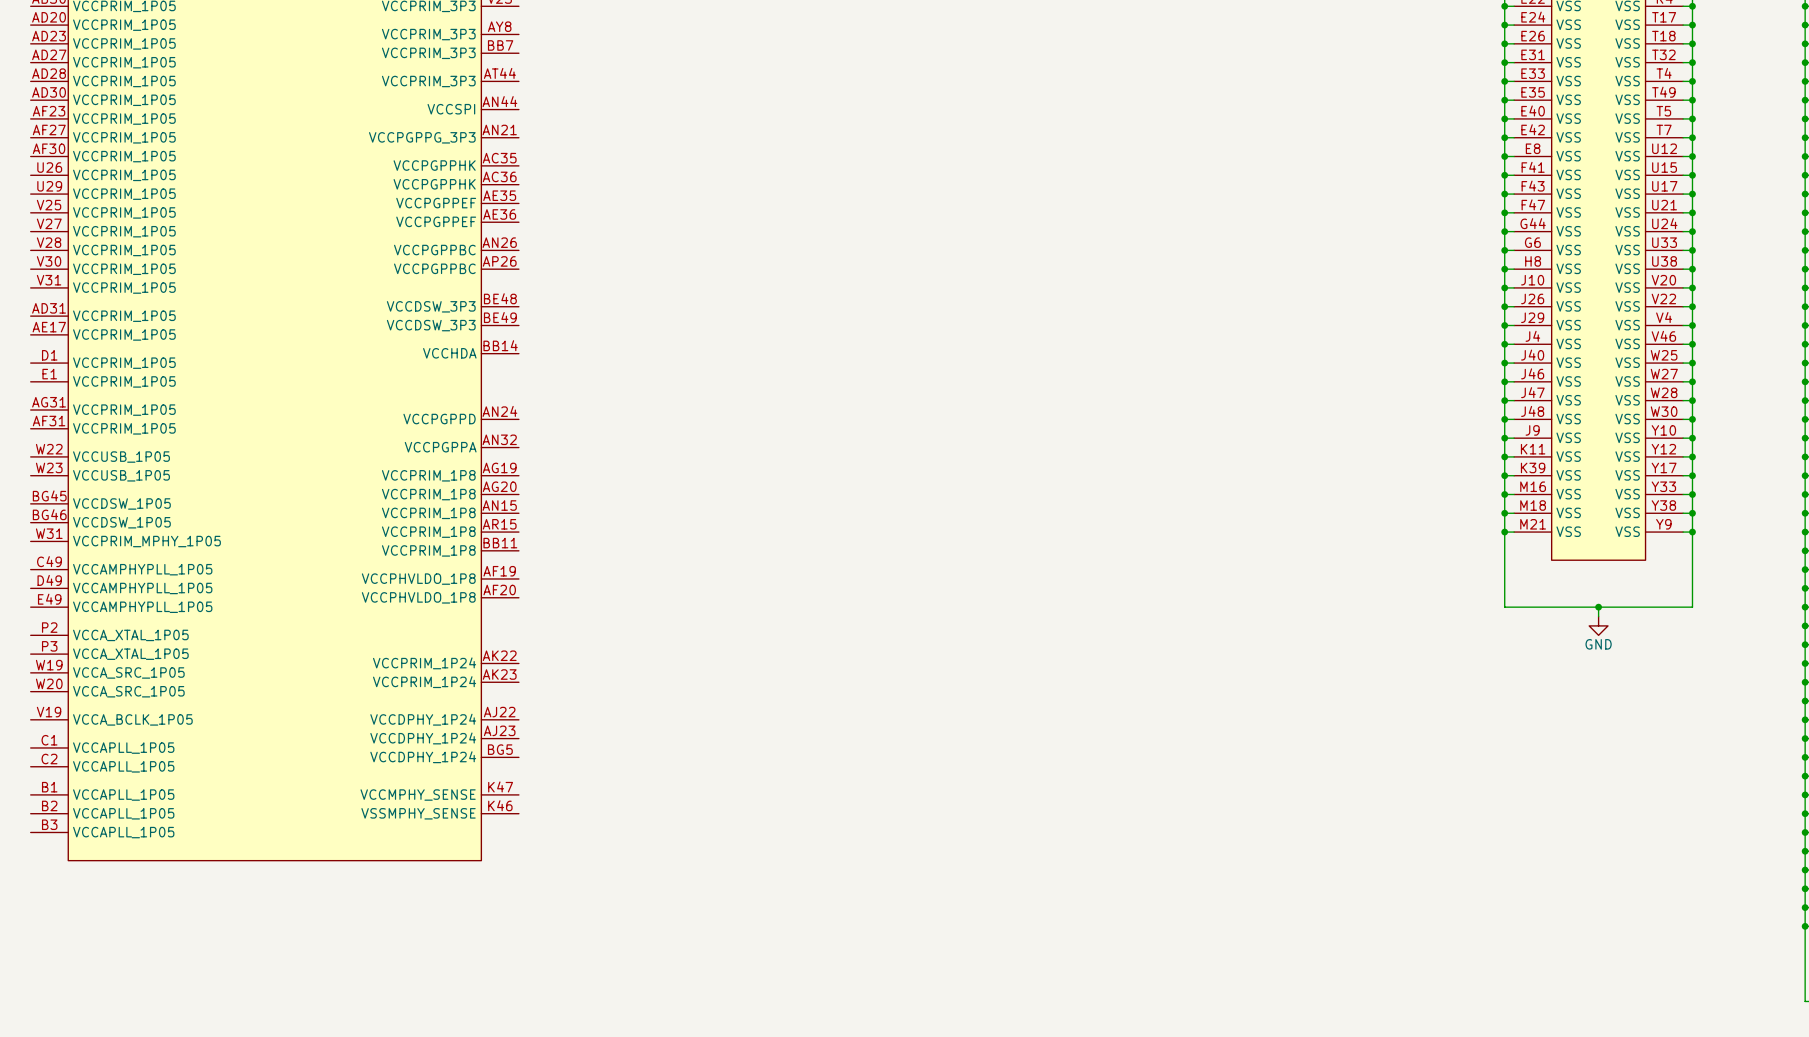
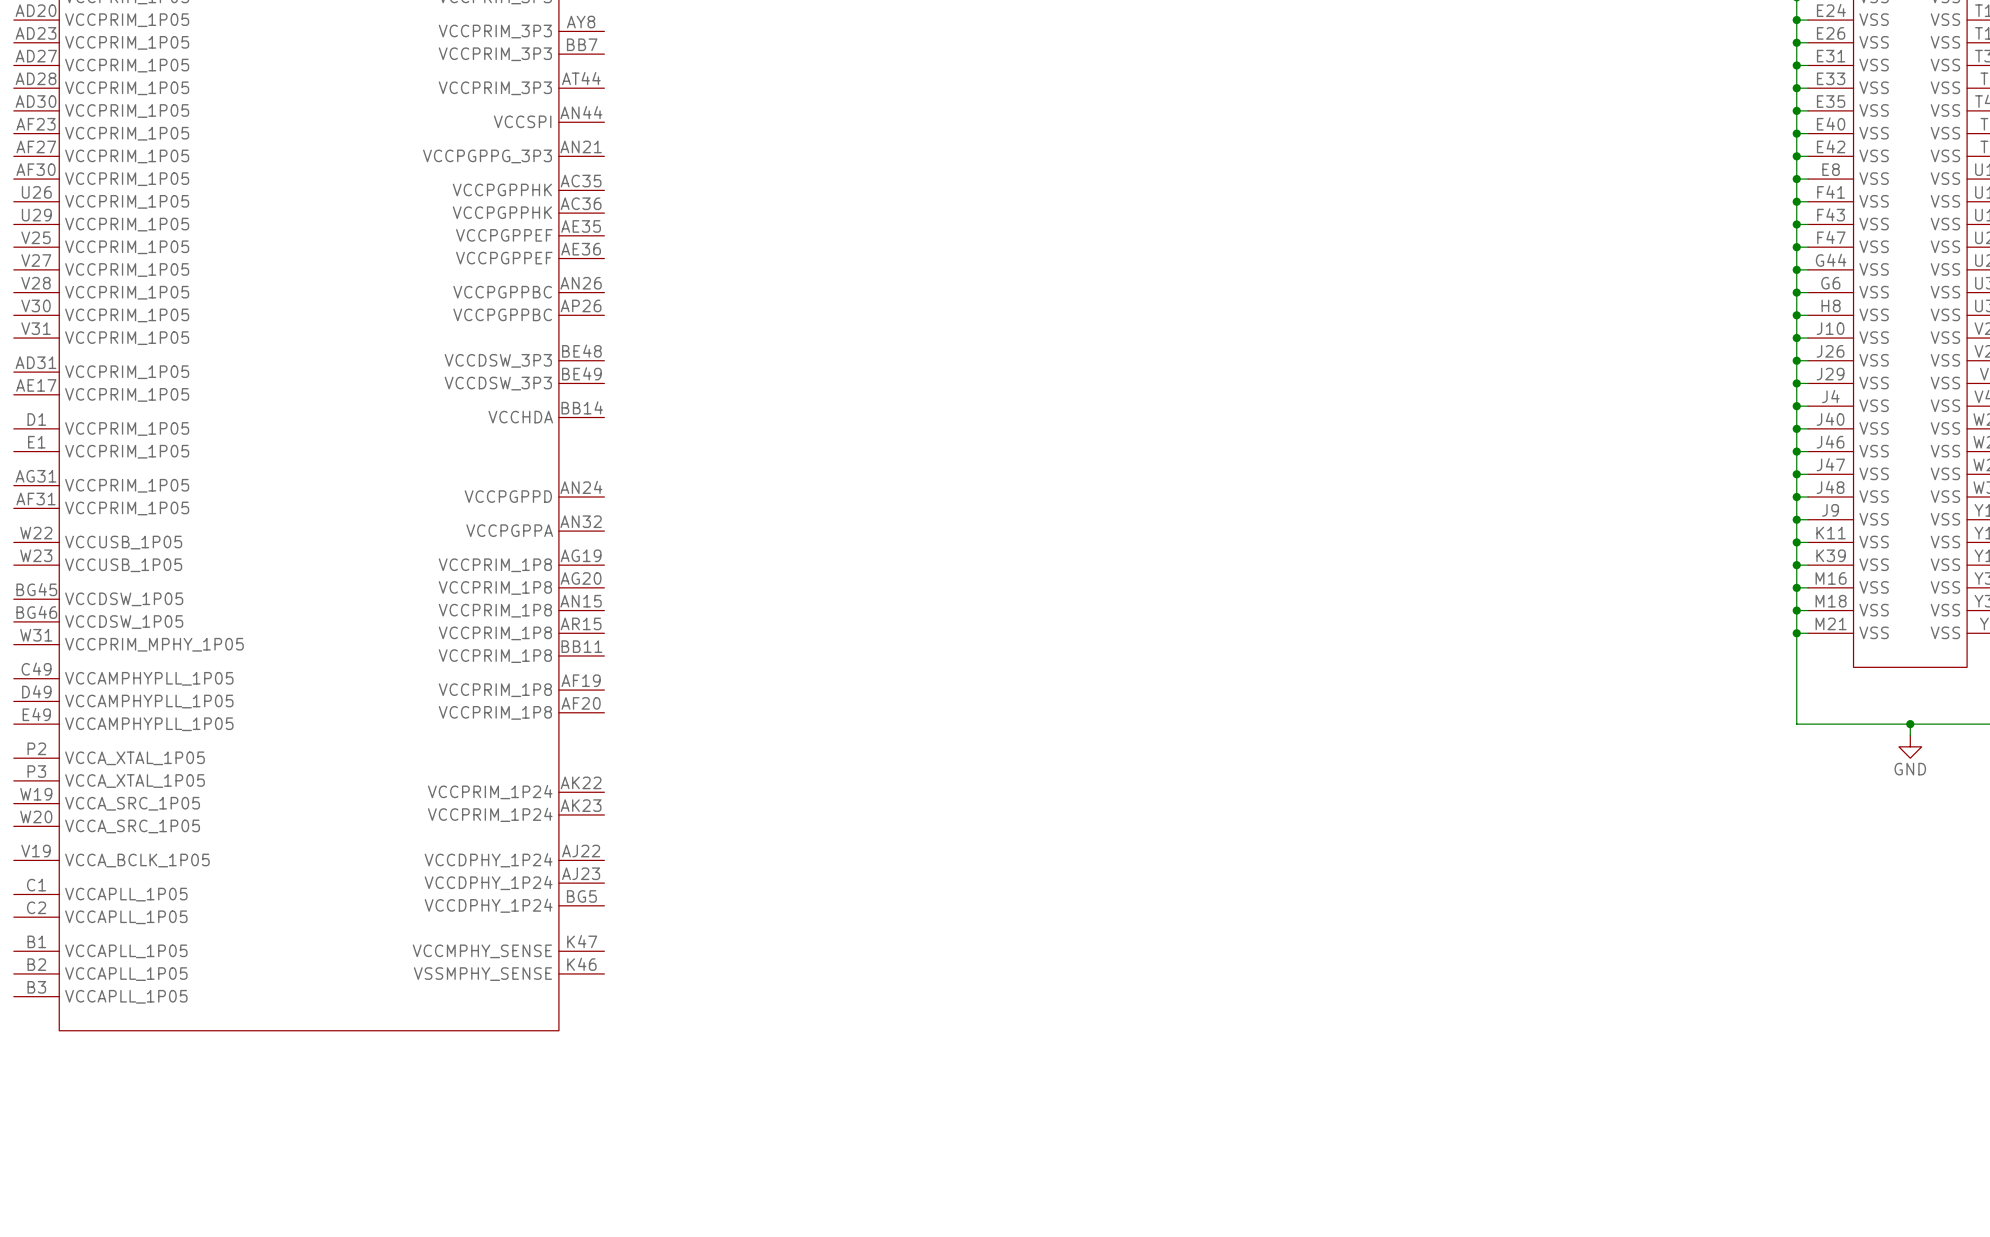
part pin name: VCCPHVLDO_1P8 (418, 579) -> VCCPRIM_1P8 (495, 690)
part pin name: VCCPHVLDO_1P8 (418, 597) -> VCCPRIM_1P8 (495, 712)

